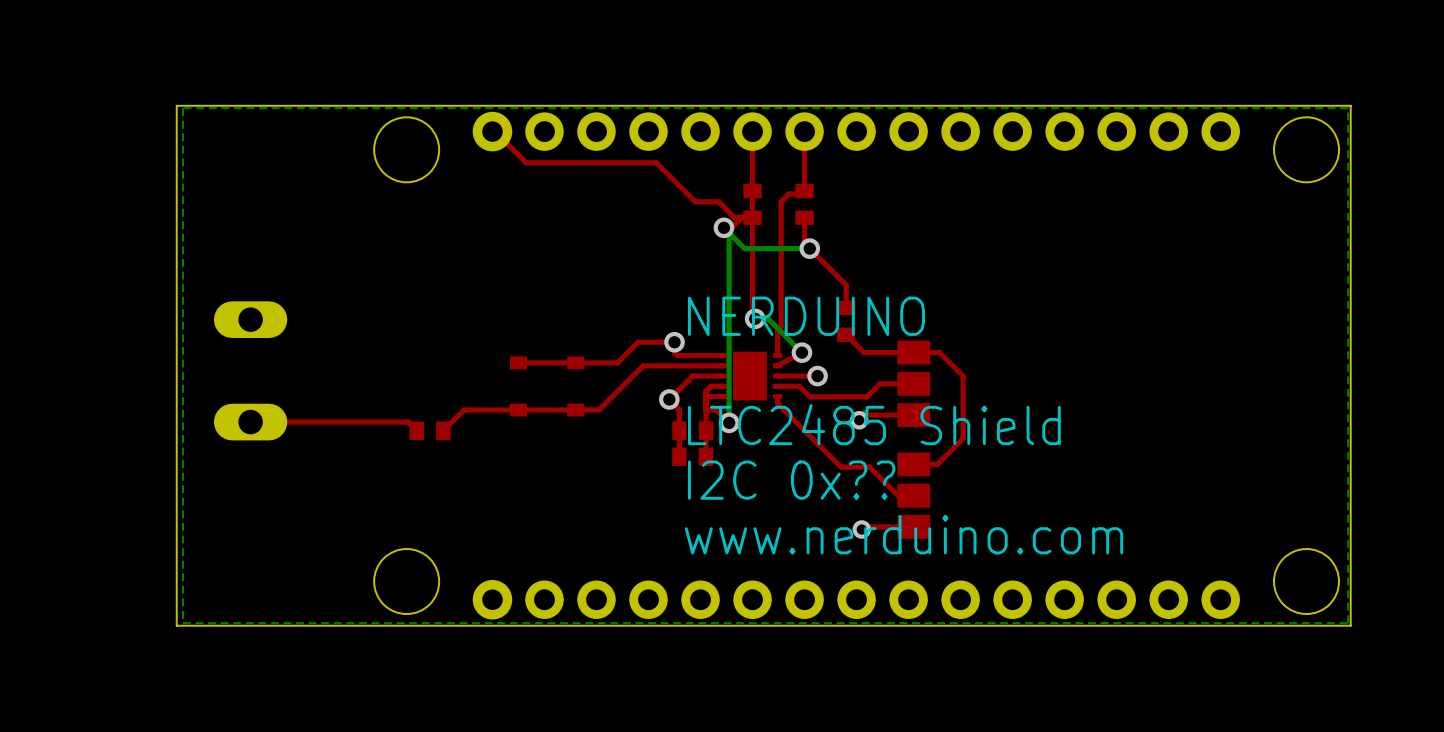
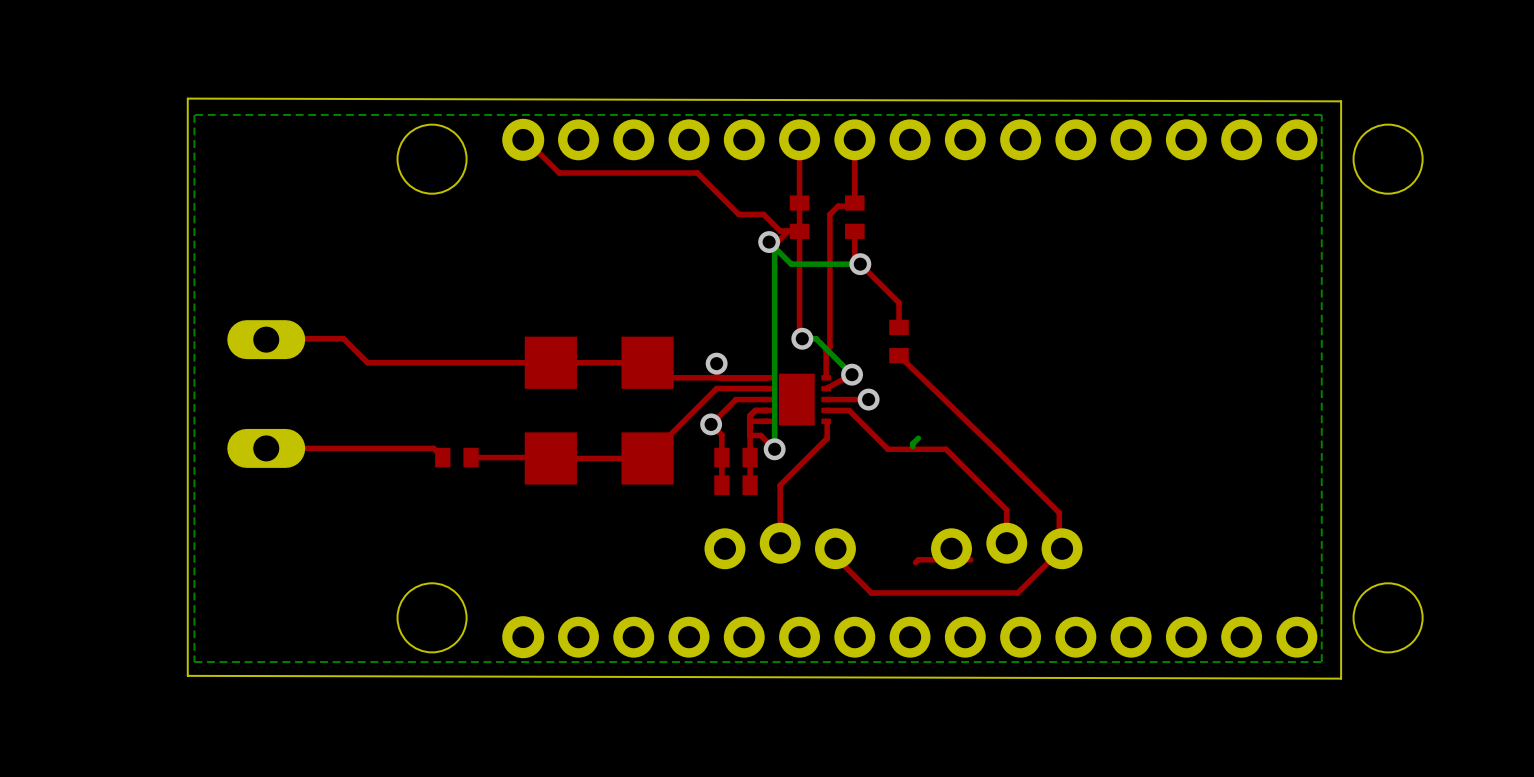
board edge: (176, 105) (1350, 105) (1350, 625) (176, 625) -> (187, 112) (187, 98) (1341, 101) (1341, 678) (187, 675) (187, 664)
bottom zone outline: (1244, 108) (1348, 108) (1348, 623) (1244, 623) -> (1321, 114) (1321, 662)
text: NERDUINO (806, 316) -> none
top track: none -> (277, 339) (343, 338) (367, 362) (647, 362) (662, 377) (719, 377)
top track: (846, 334) (864, 352) (939, 352) (963, 376) (963, 438) (937, 464) (913, 464) -> (899, 355) (1059, 512) (1059, 546) (1062, 548) (1017, 592) (871, 592) (835, 557) (835, 548)
top track: (670, 338) (666, 342) (638, 342) (617, 362) (518, 362) -> none
part footprint: [509, 356, 527, 417] -> [524, 336, 577, 485]
top track: (722, 365) (643, 365) (599, 409) (575, 409) -> (767, 388) (716, 388) (646, 458)
top track: (913, 383) (879, 383) (866, 396) (809, 396) -> (1006, 543) (1006, 510) (945, 449) (887, 449) (860, 421)
part: (913, 383) -> none
part: (575, 386) -> none
part: none -> (647, 410)
top track: (777, 396) (777, 403) (840, 467) (869, 467) (898, 495) (913, 495) -> (826, 421) (827, 438) (780, 485) (780, 543)
top track: (575, 410) (464, 410) (443, 430) -> (556, 457) (471, 457)
top track: (913, 415) (864, 415) (859, 420) -> none
via: (859, 420) -> none
text: LTC2485 Shield (874, 424) -> none
top track: none -> (647, 458) (550, 458)
text: I2C 0x?? (791, 480) -> none
part: (913, 495) -> none
part: none -> (780, 546)
part: none -> (1006, 546)
via: (861, 529) -> none
text: www.nerduino.com (904, 534) -> none

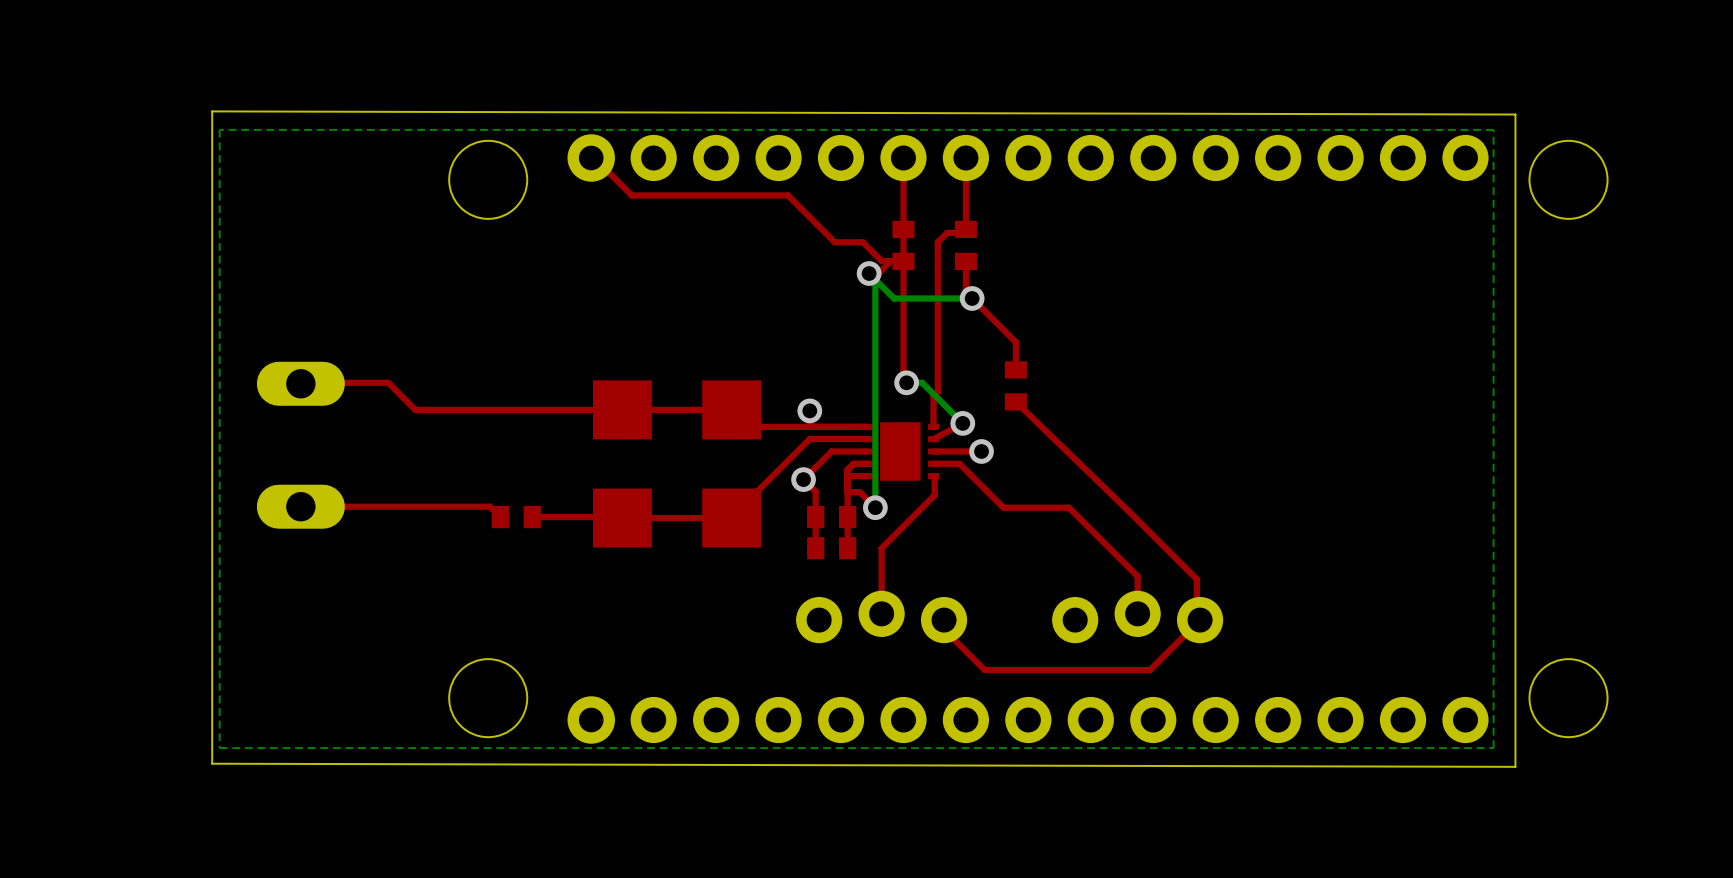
bottom track: (918, 438) (912, 443) (912, 446) -> none
top track: (970, 559) (918, 559) (915, 562) -> none

